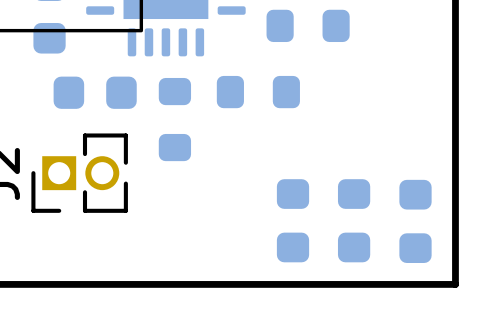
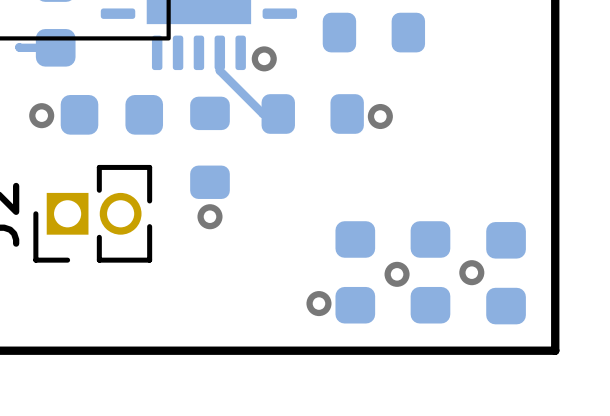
bottom track: none -> (19, 47) (55, 47)
bottom track: none -> (219, 52) (219, 70) (263, 113) (278, 113)
via: none -> (264, 58)
via: none -> (41, 115)
via: none -> (380, 116)
via: none -> (209, 216)
via: none -> (471, 272)
via: none -> (397, 274)
via: none -> (318, 303)

